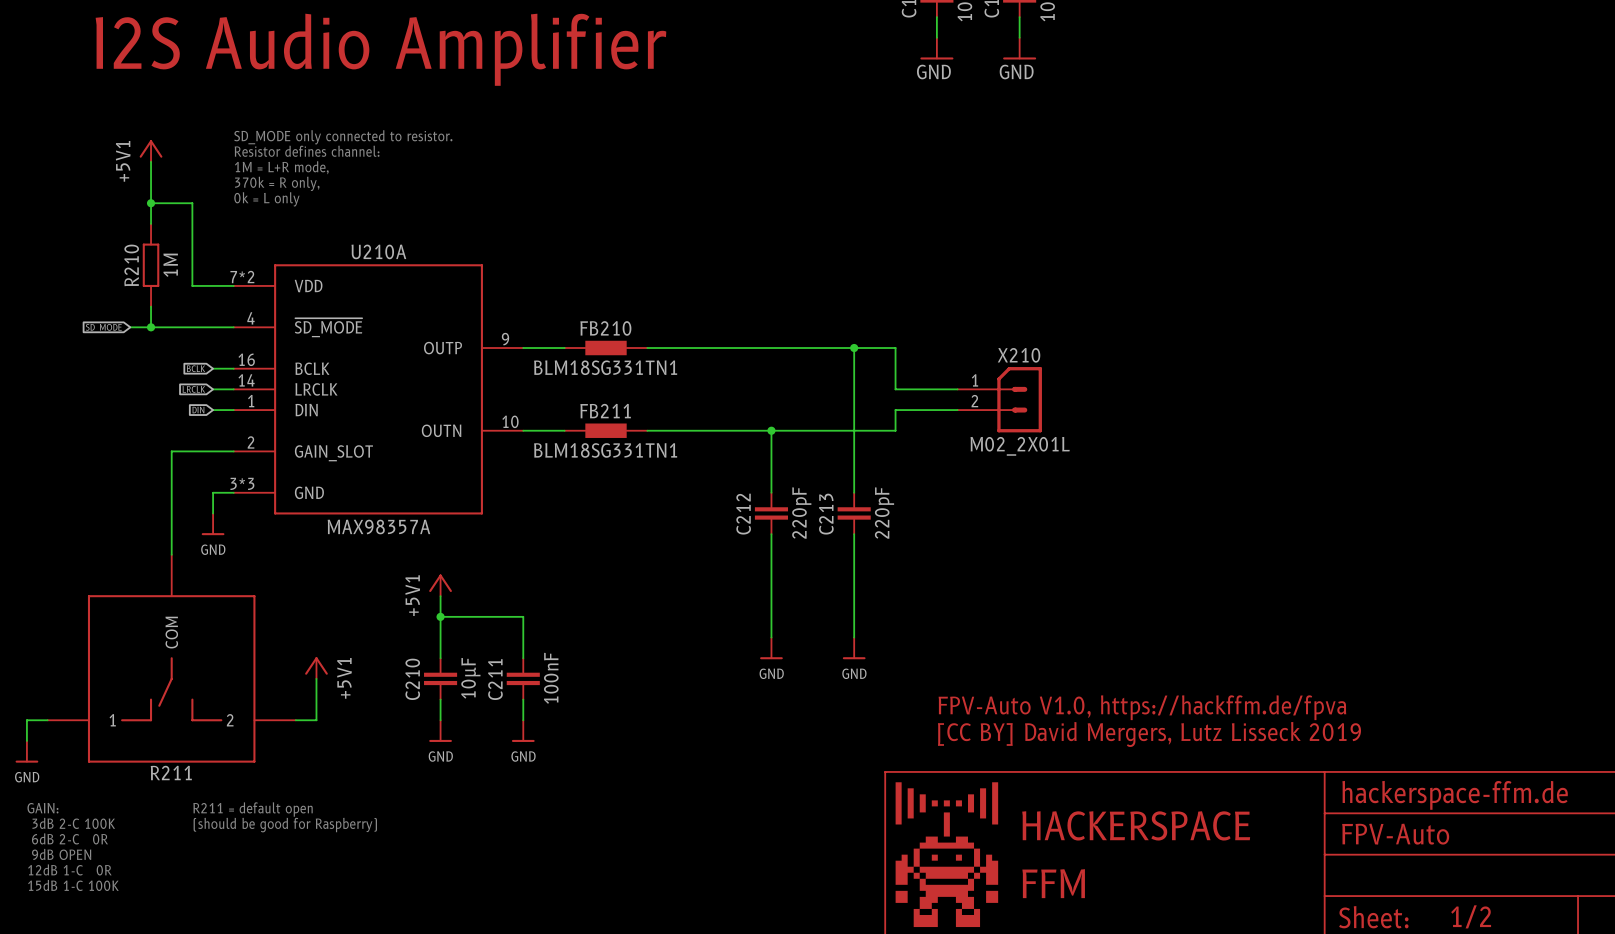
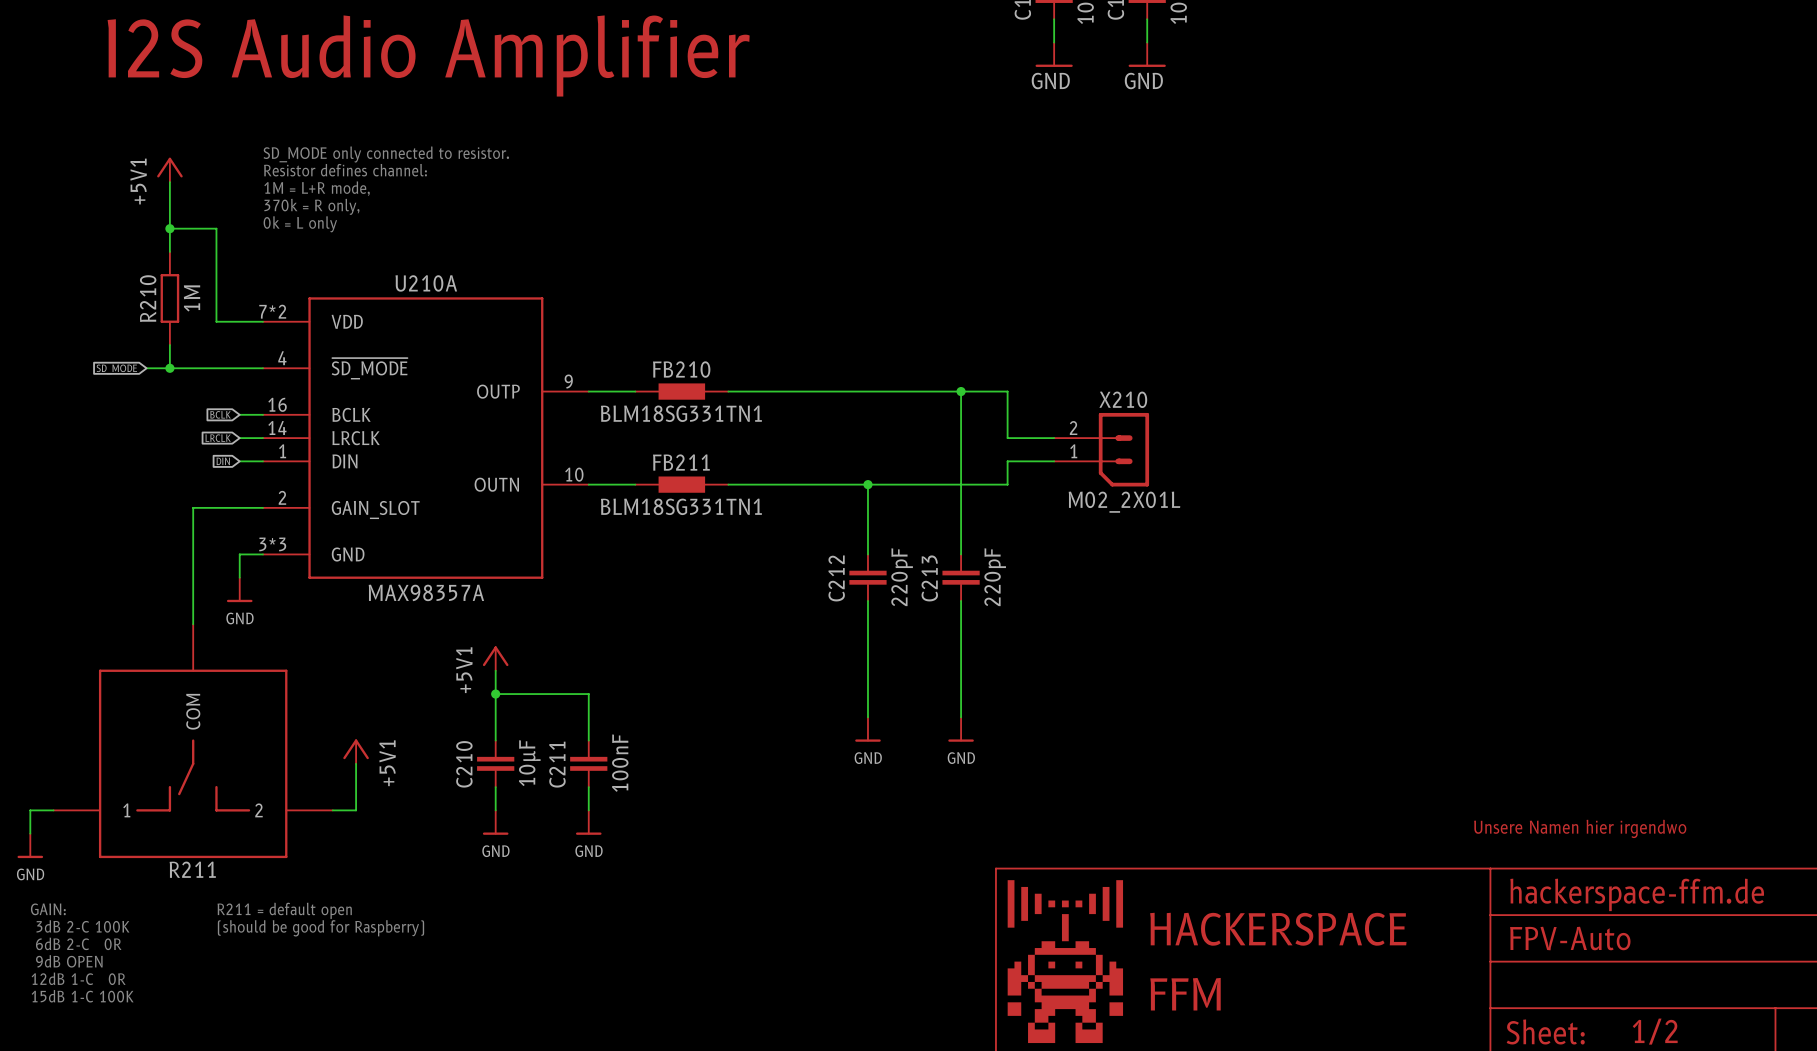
X210 flip: as is (1019, 399) -> up-down (1123, 449)
text: FPV-Auto V1.0, https://hackffm.de/fpva (1142, 707) -> none
text: [CC BY] David Mergers, Lutz Lisseck 2019 (1149, 734) -> none
text: none -> Unsere Namen hier irgendwo (1580, 828)

